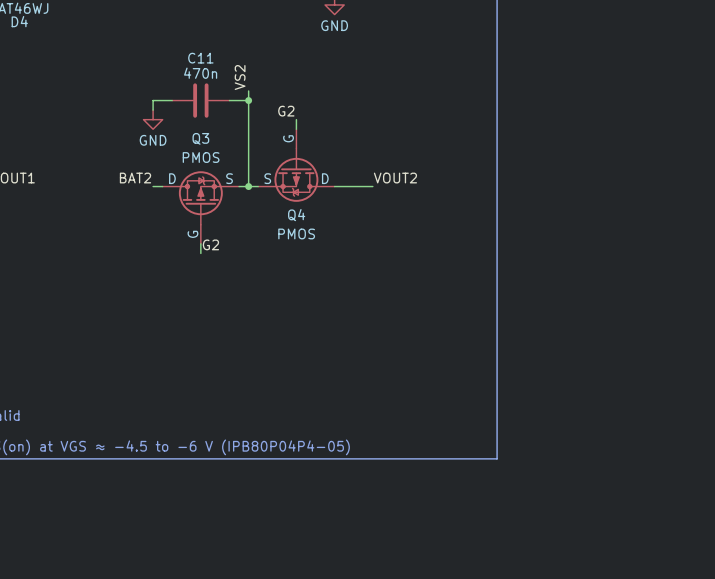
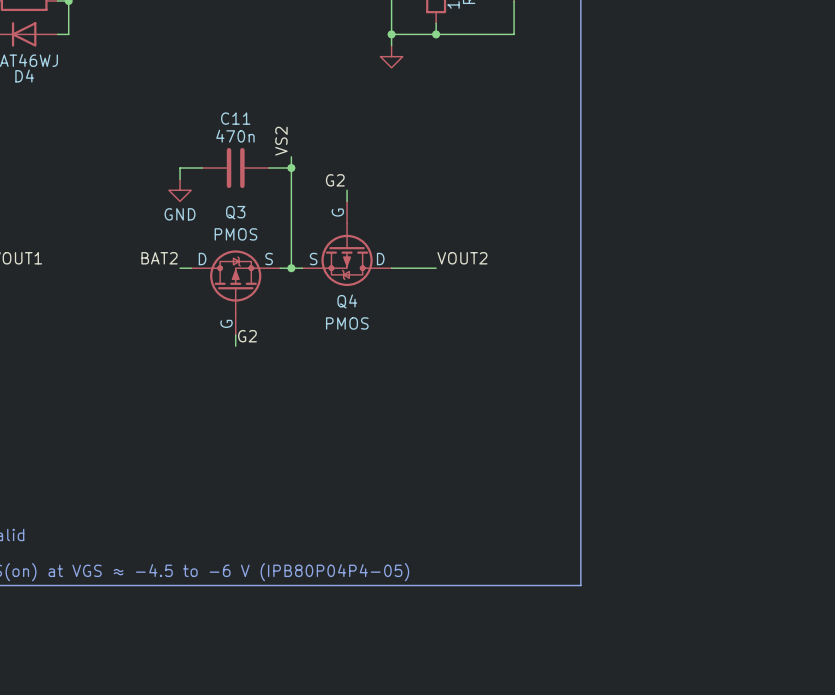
power symbol text: GND (334, 25) -> none

